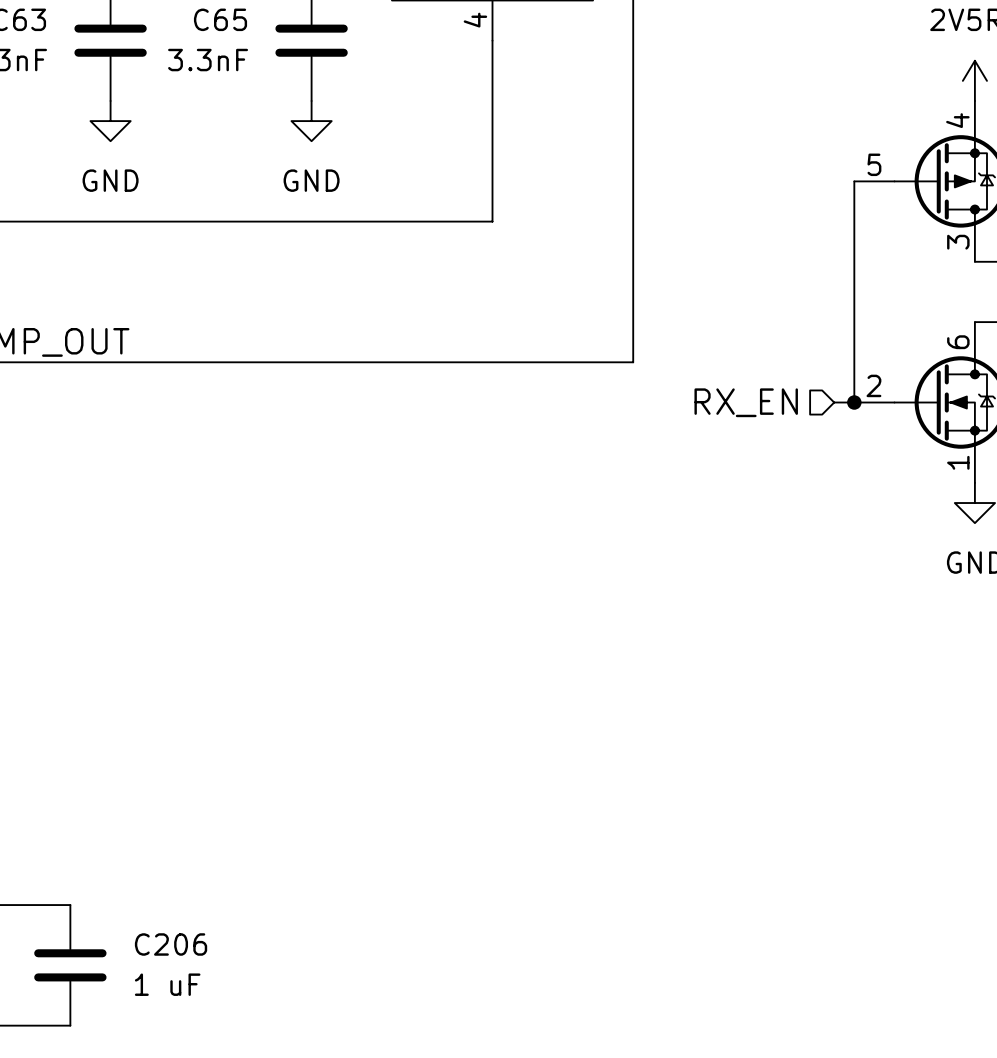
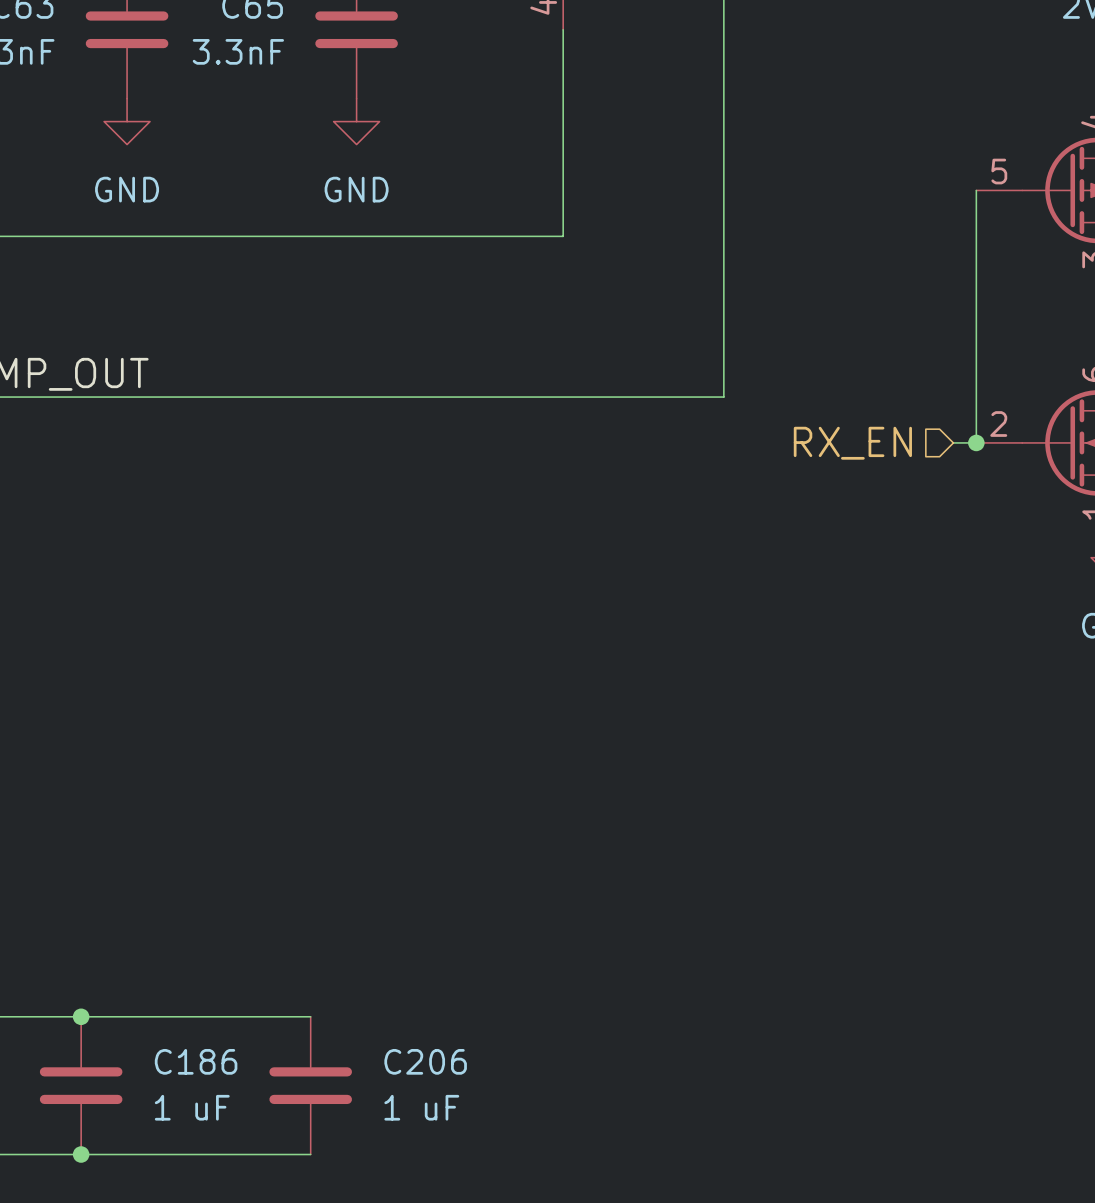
wire: none -> (81, 1016) (310, 1016)
junction: none -> (81, 1016)
C206 name: C206 (171, 944) -> C186 (196, 1061)
C206: none -> 1 uF (310, 1085)
wire: none -> (81, 1154) (310, 1154)
junction: none -> (81, 1154)

